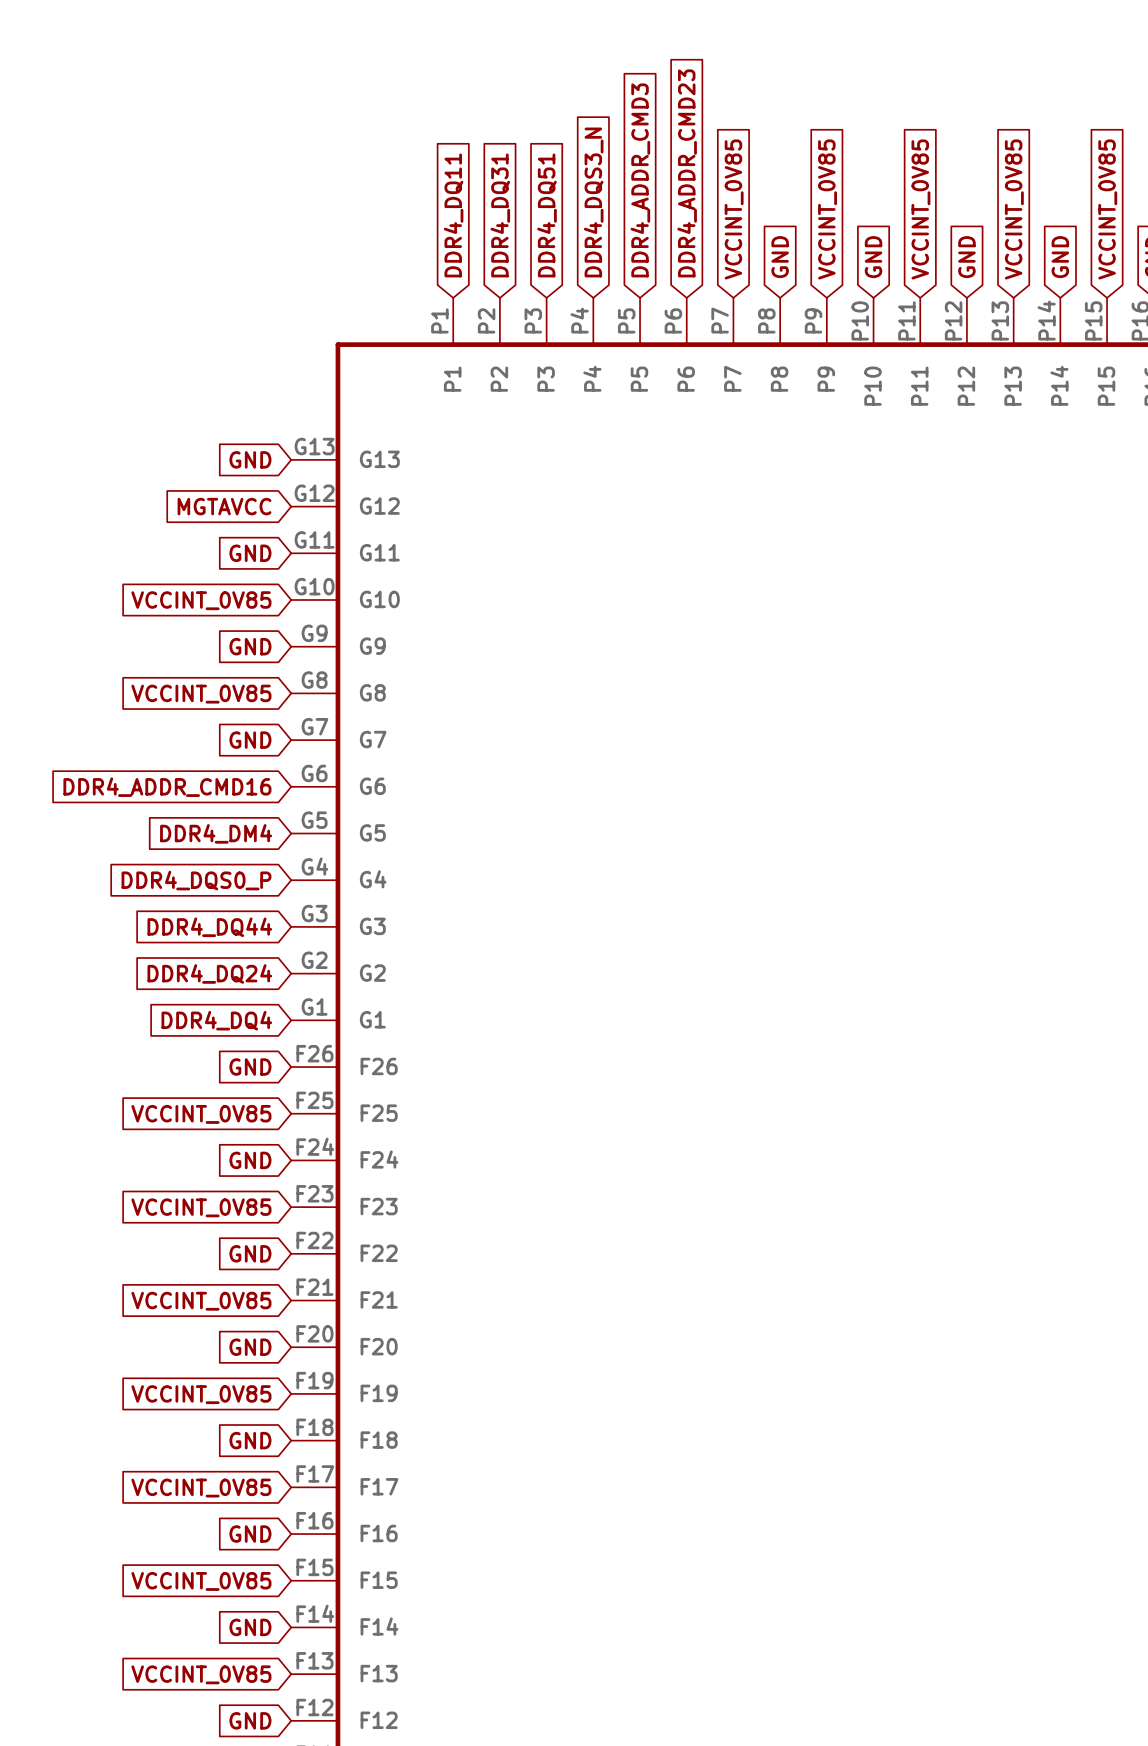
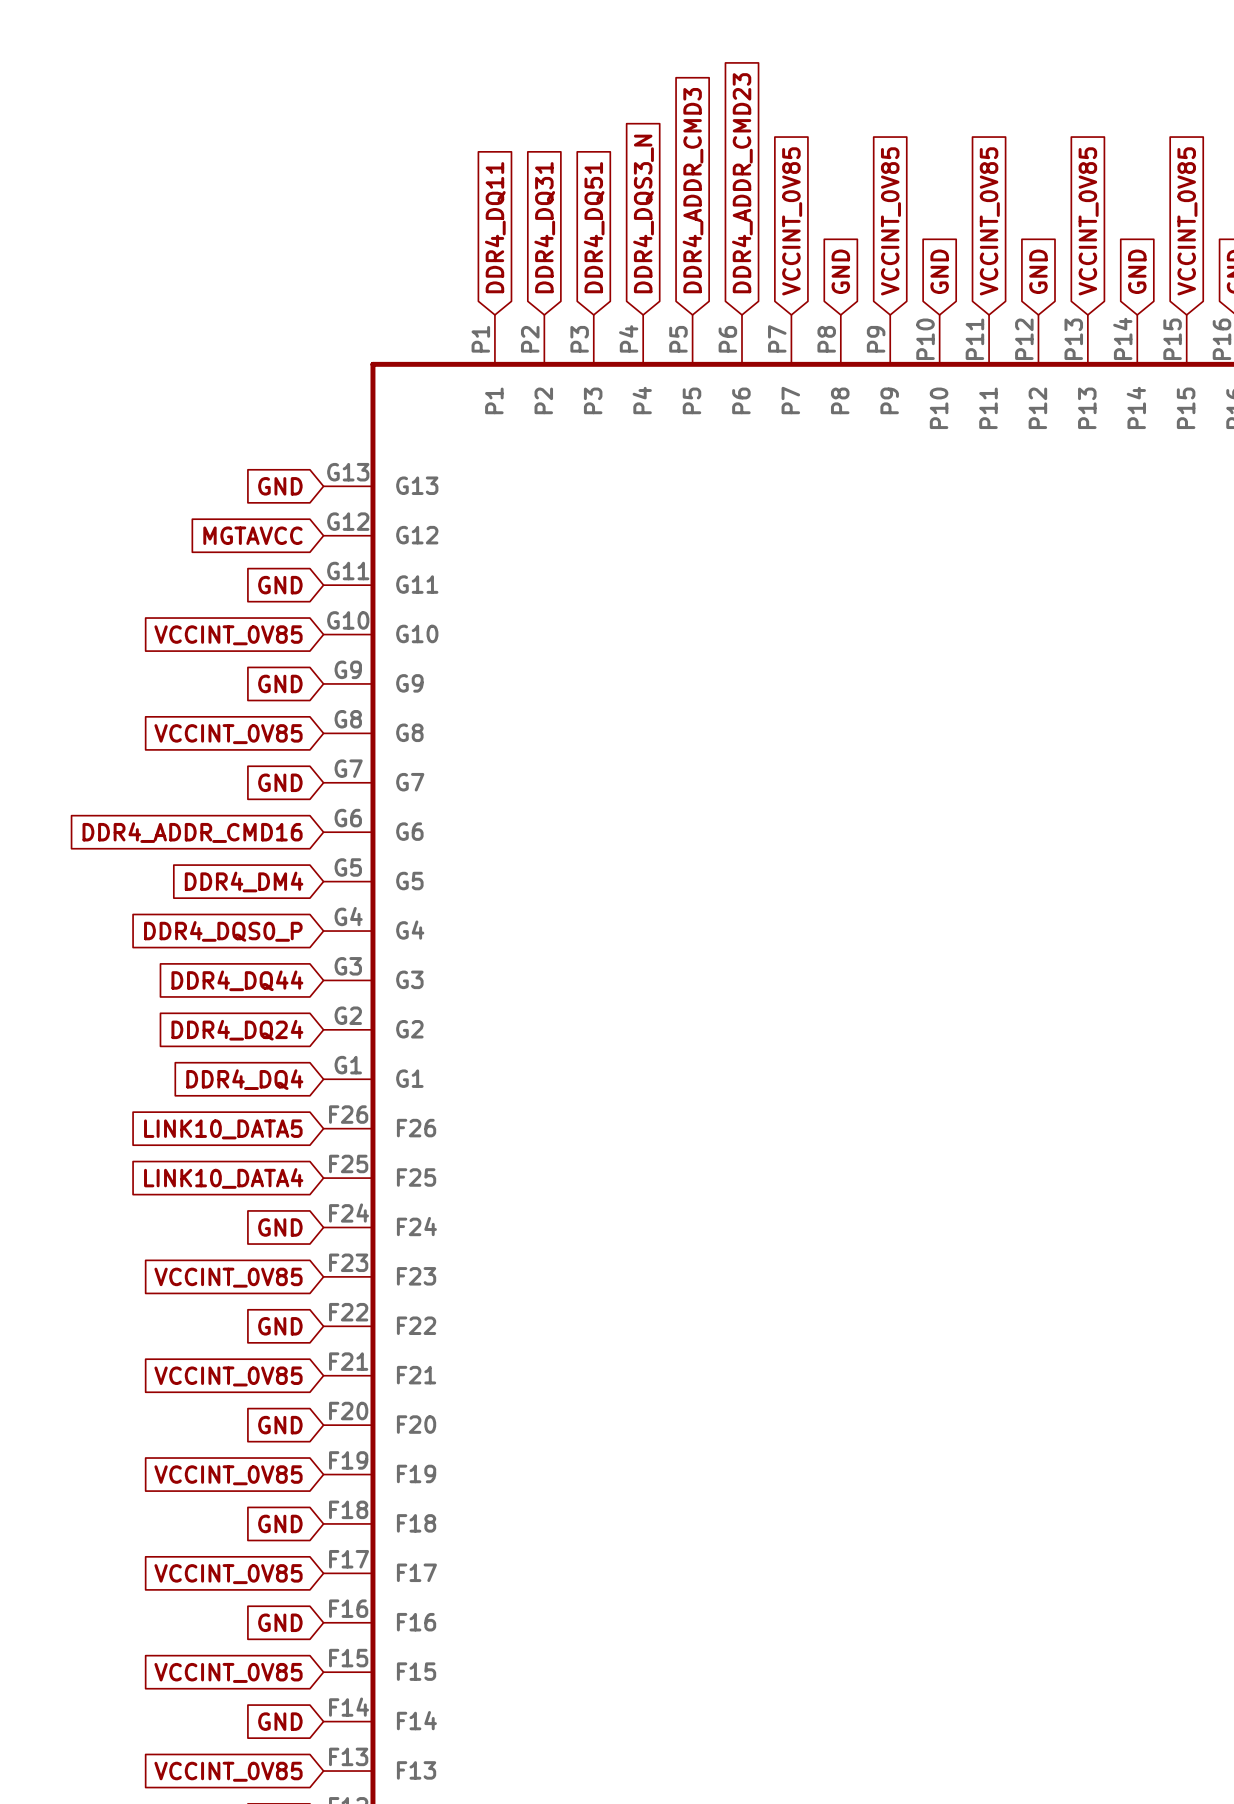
global label: GND (250, 1067) -> LINK10_DATA5 (223, 1129)
global label: VCCINT_0V85 (201, 1114) -> LINK10_DATA4 (223, 1178)

